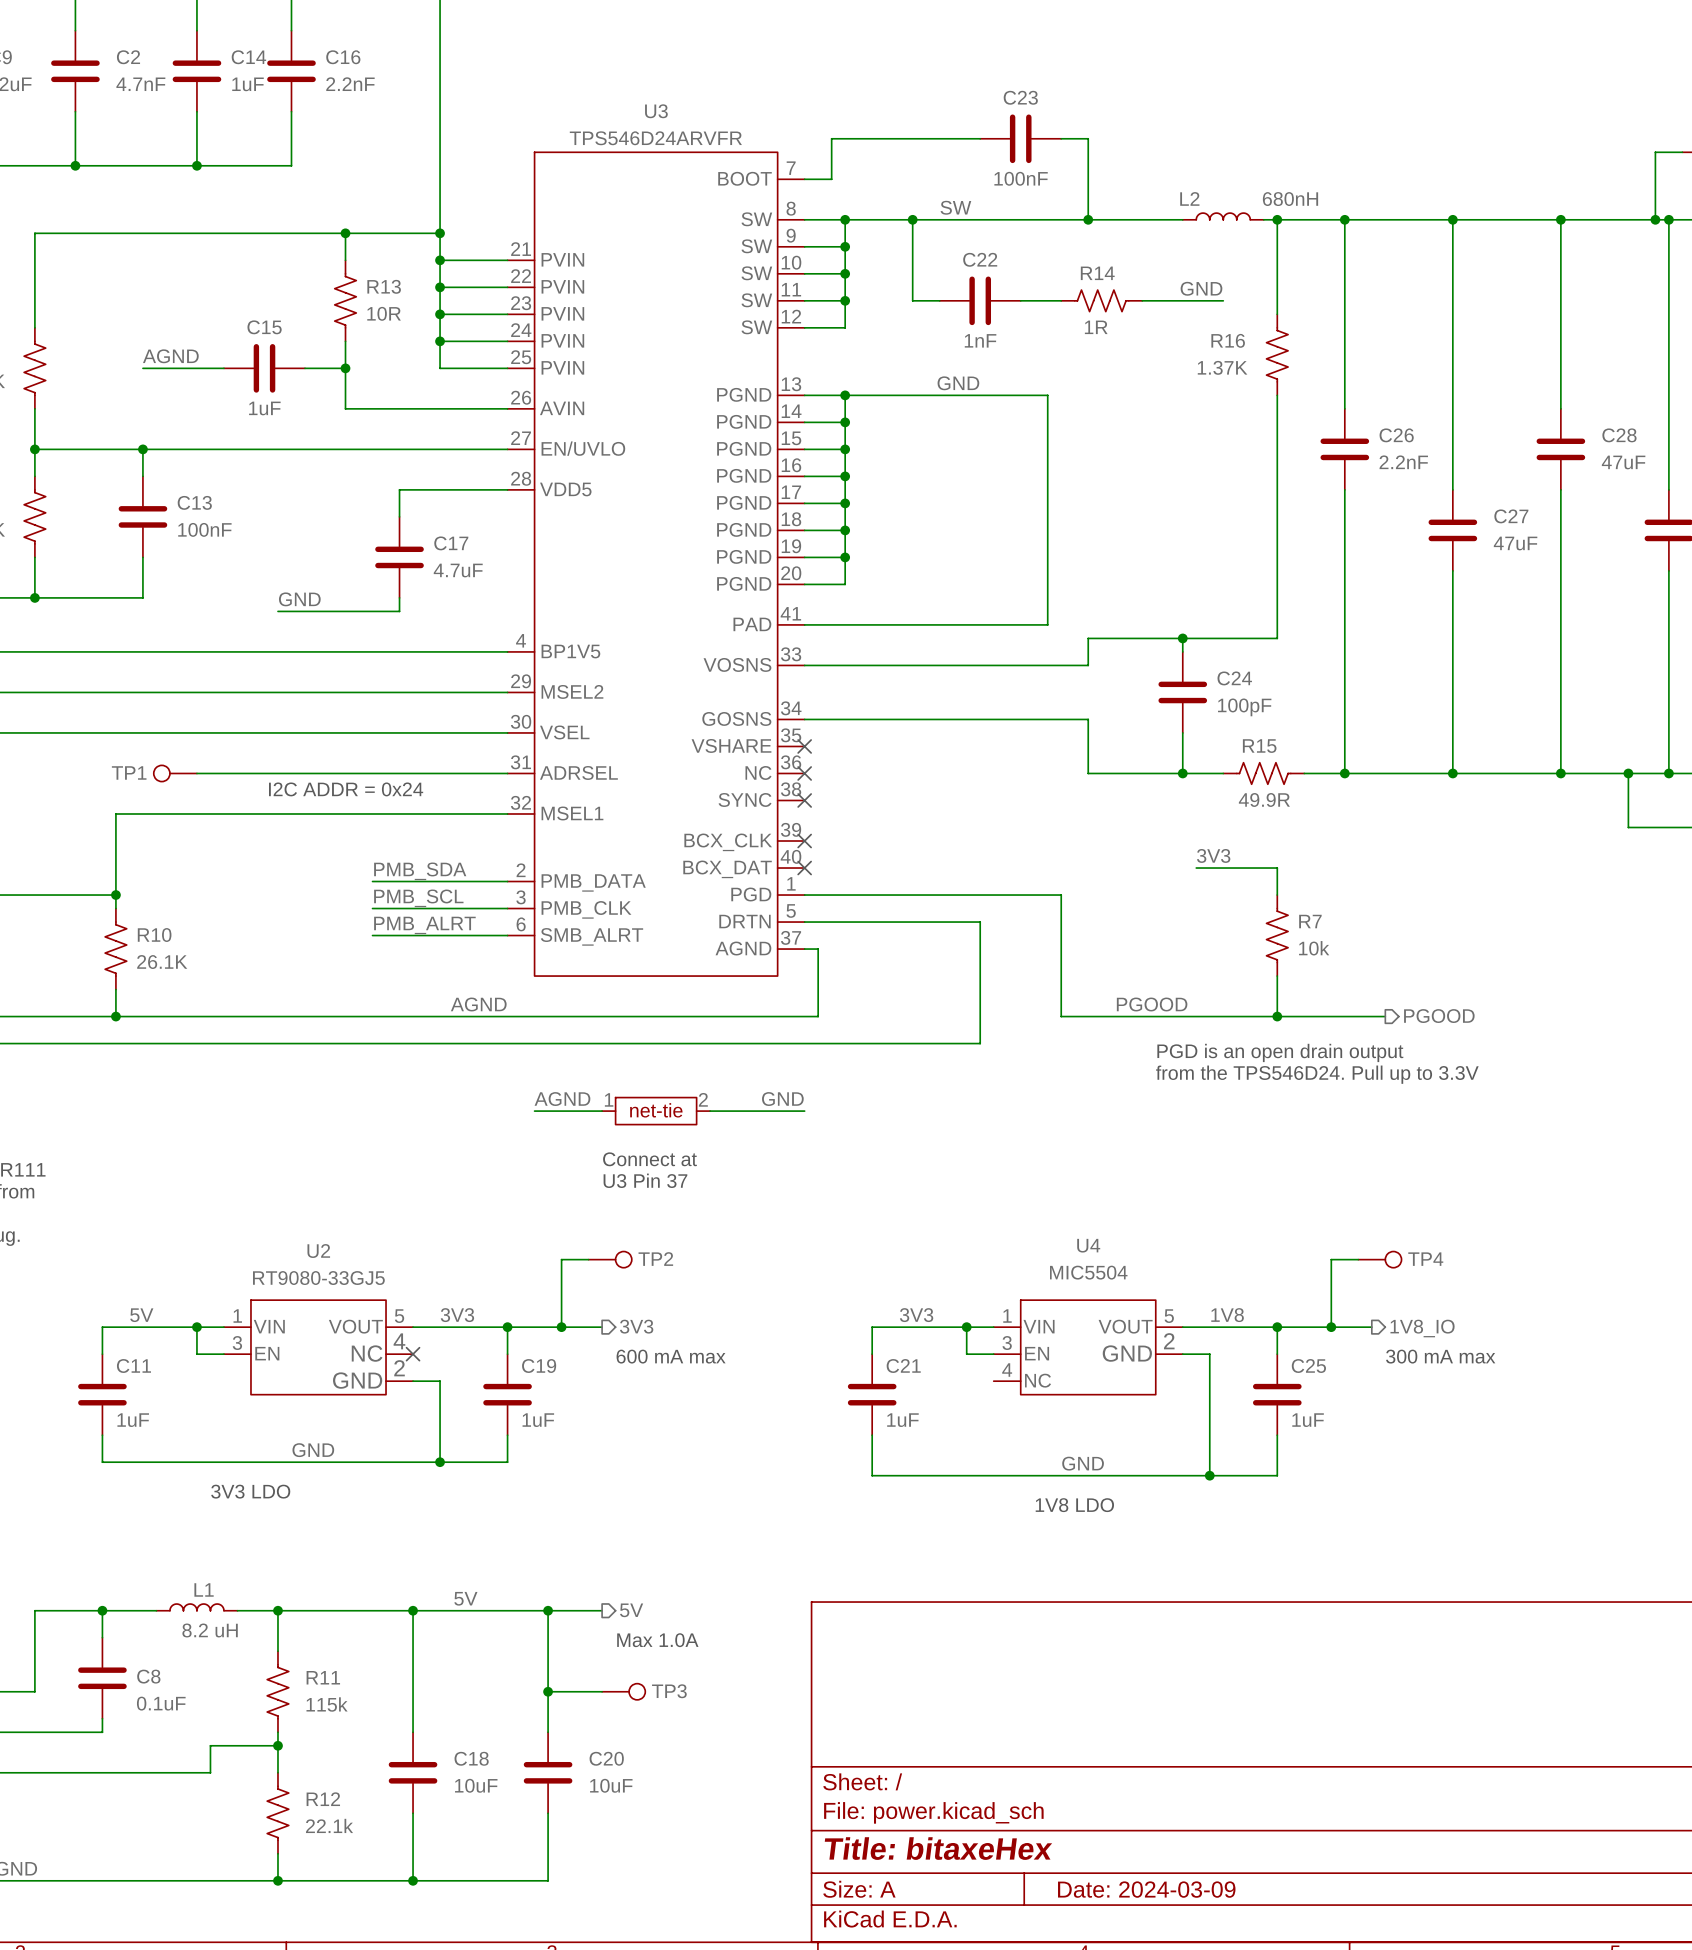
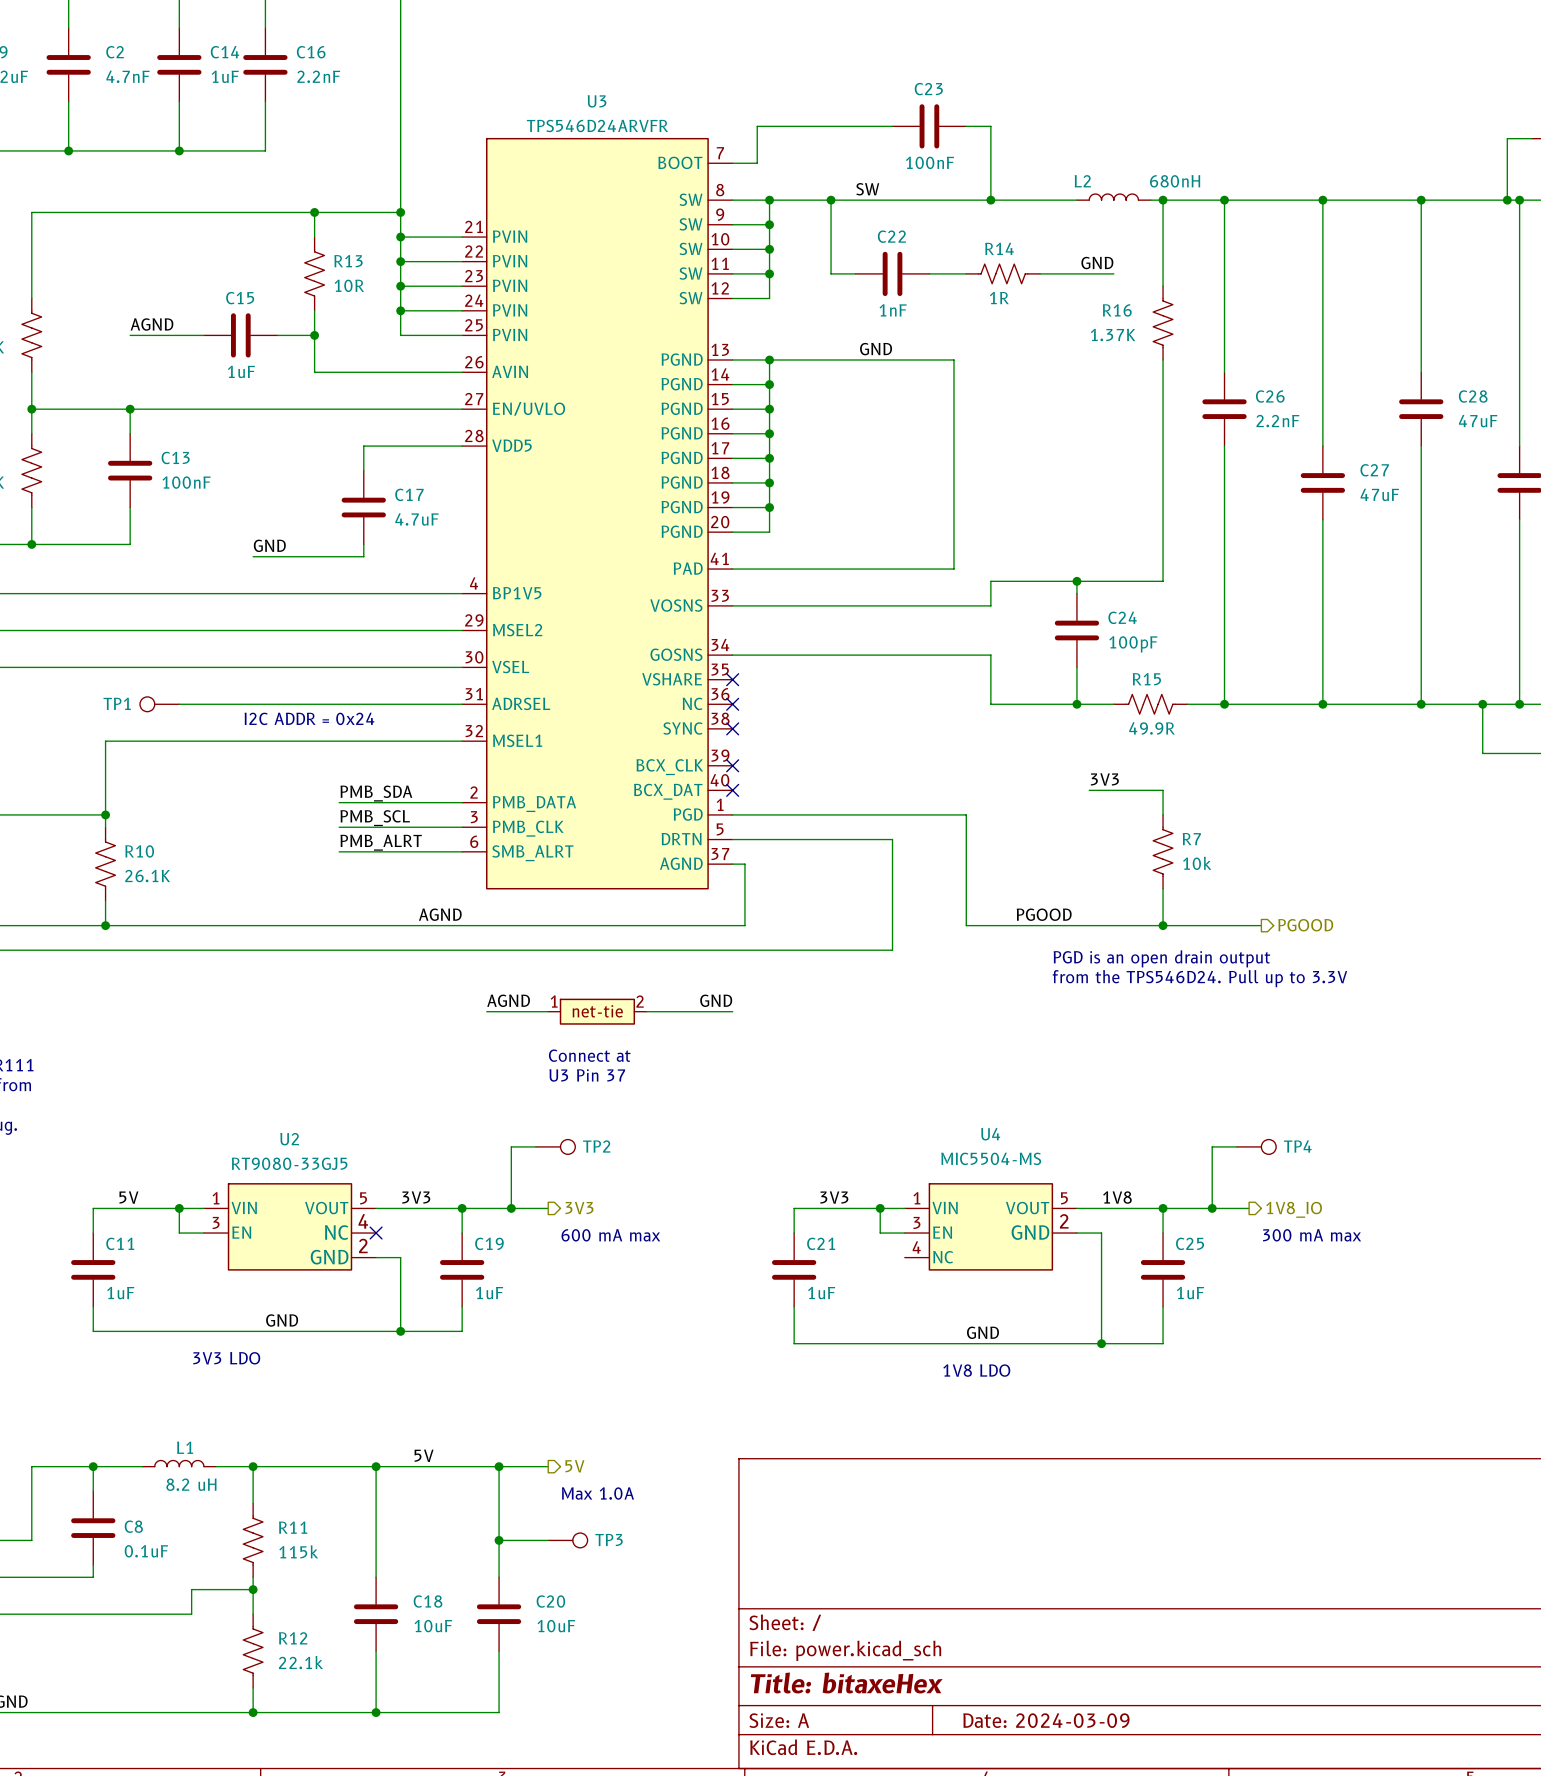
U4 value: MIC5504 (1088, 1272) -> MIC5504-MS (991, 1158)

